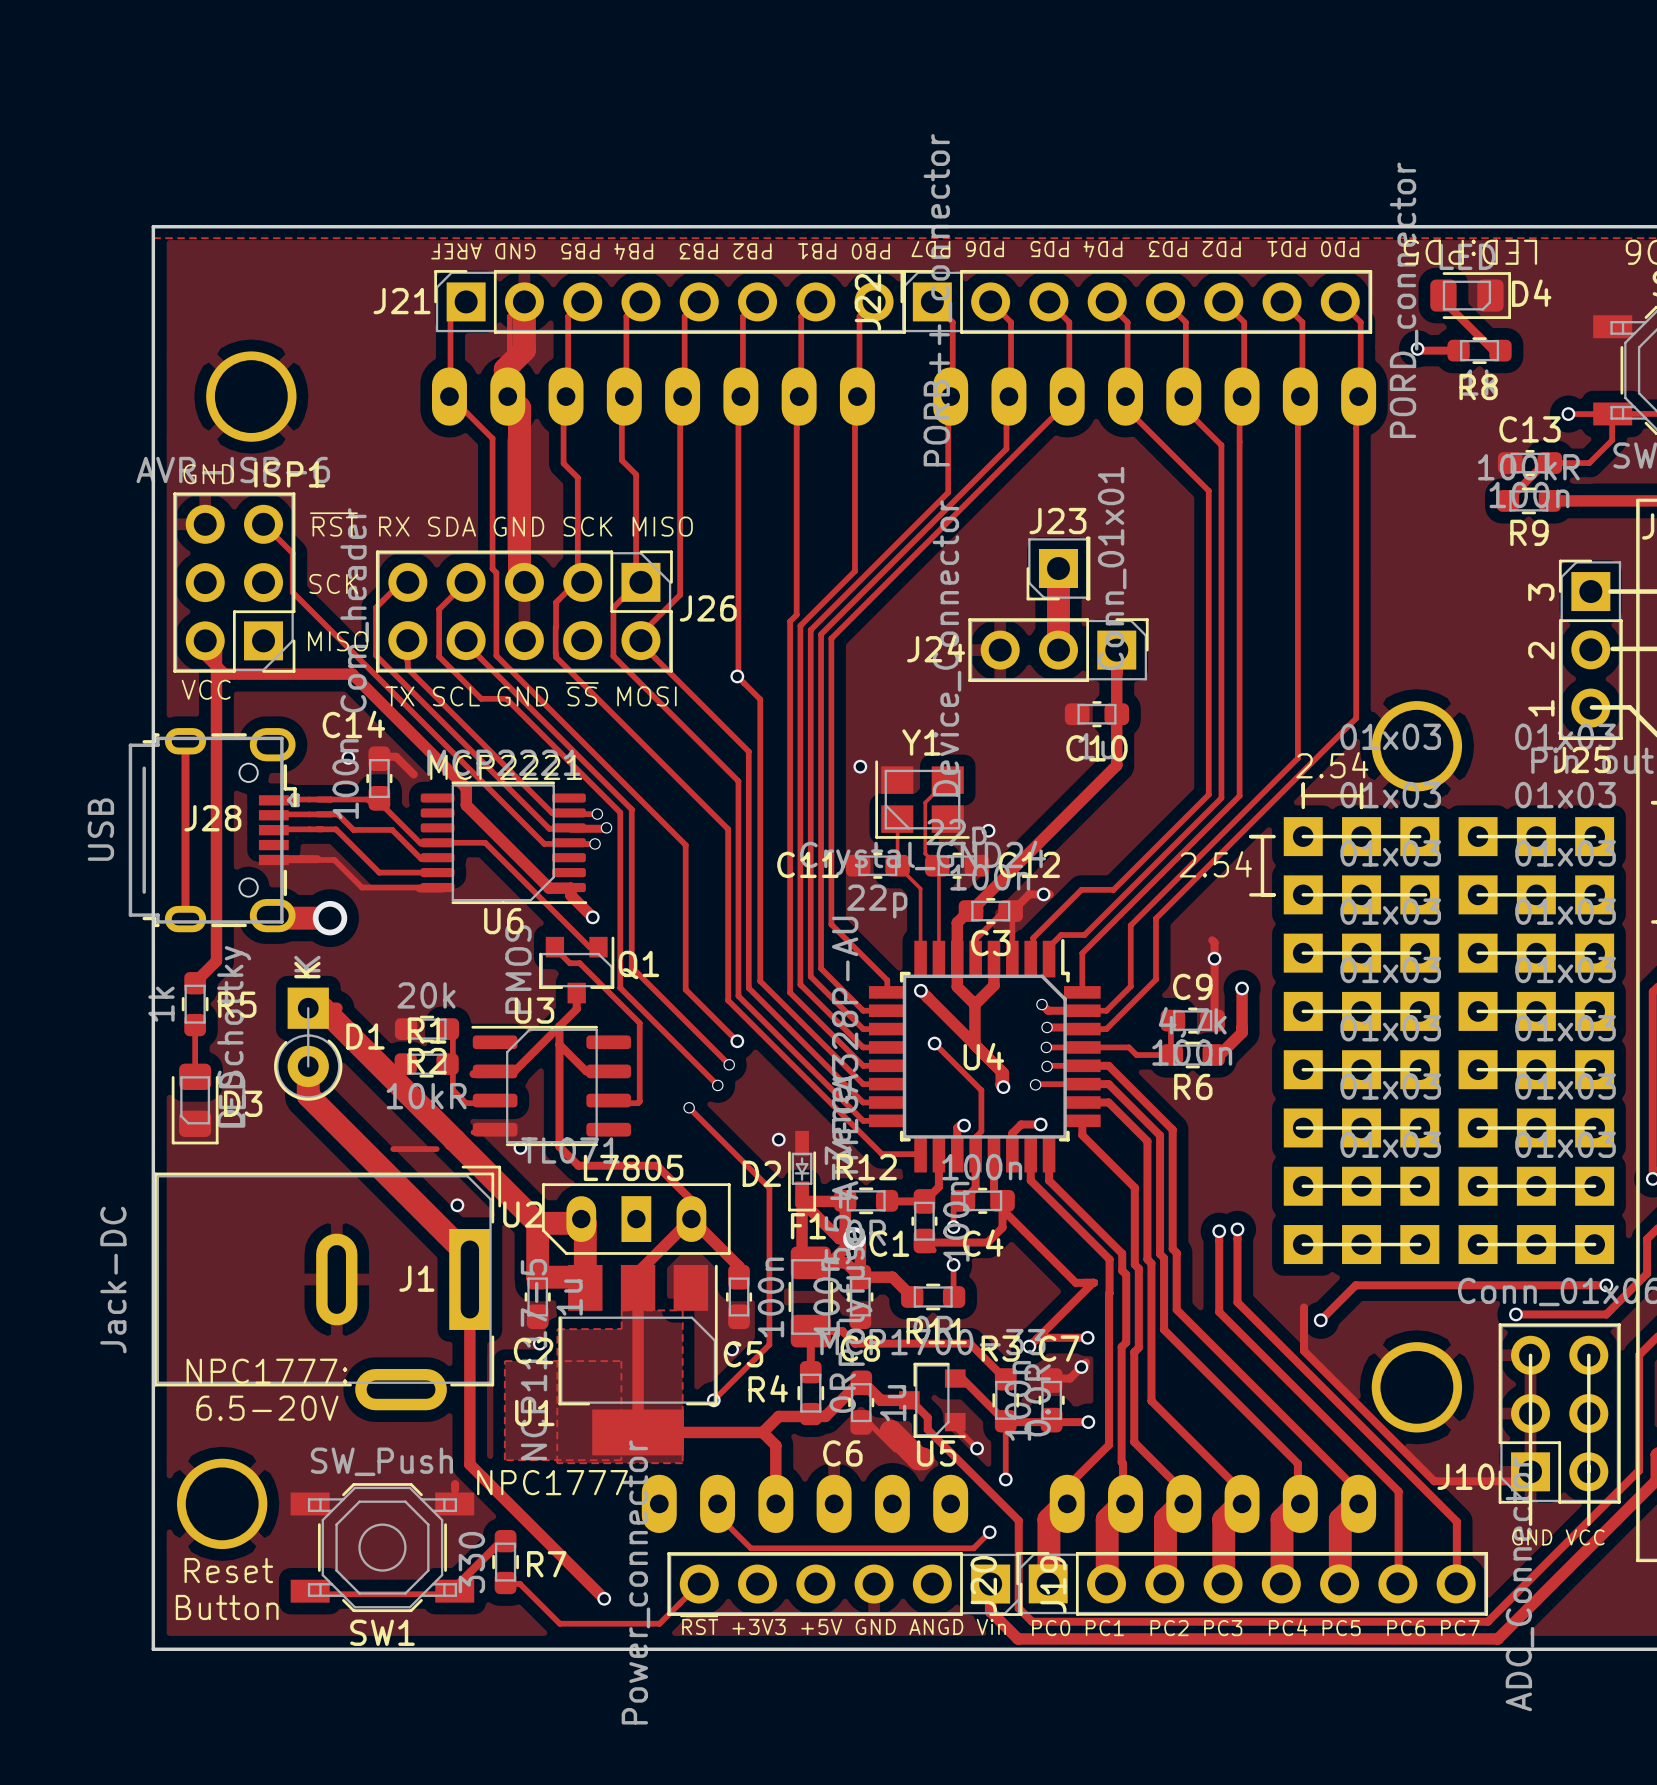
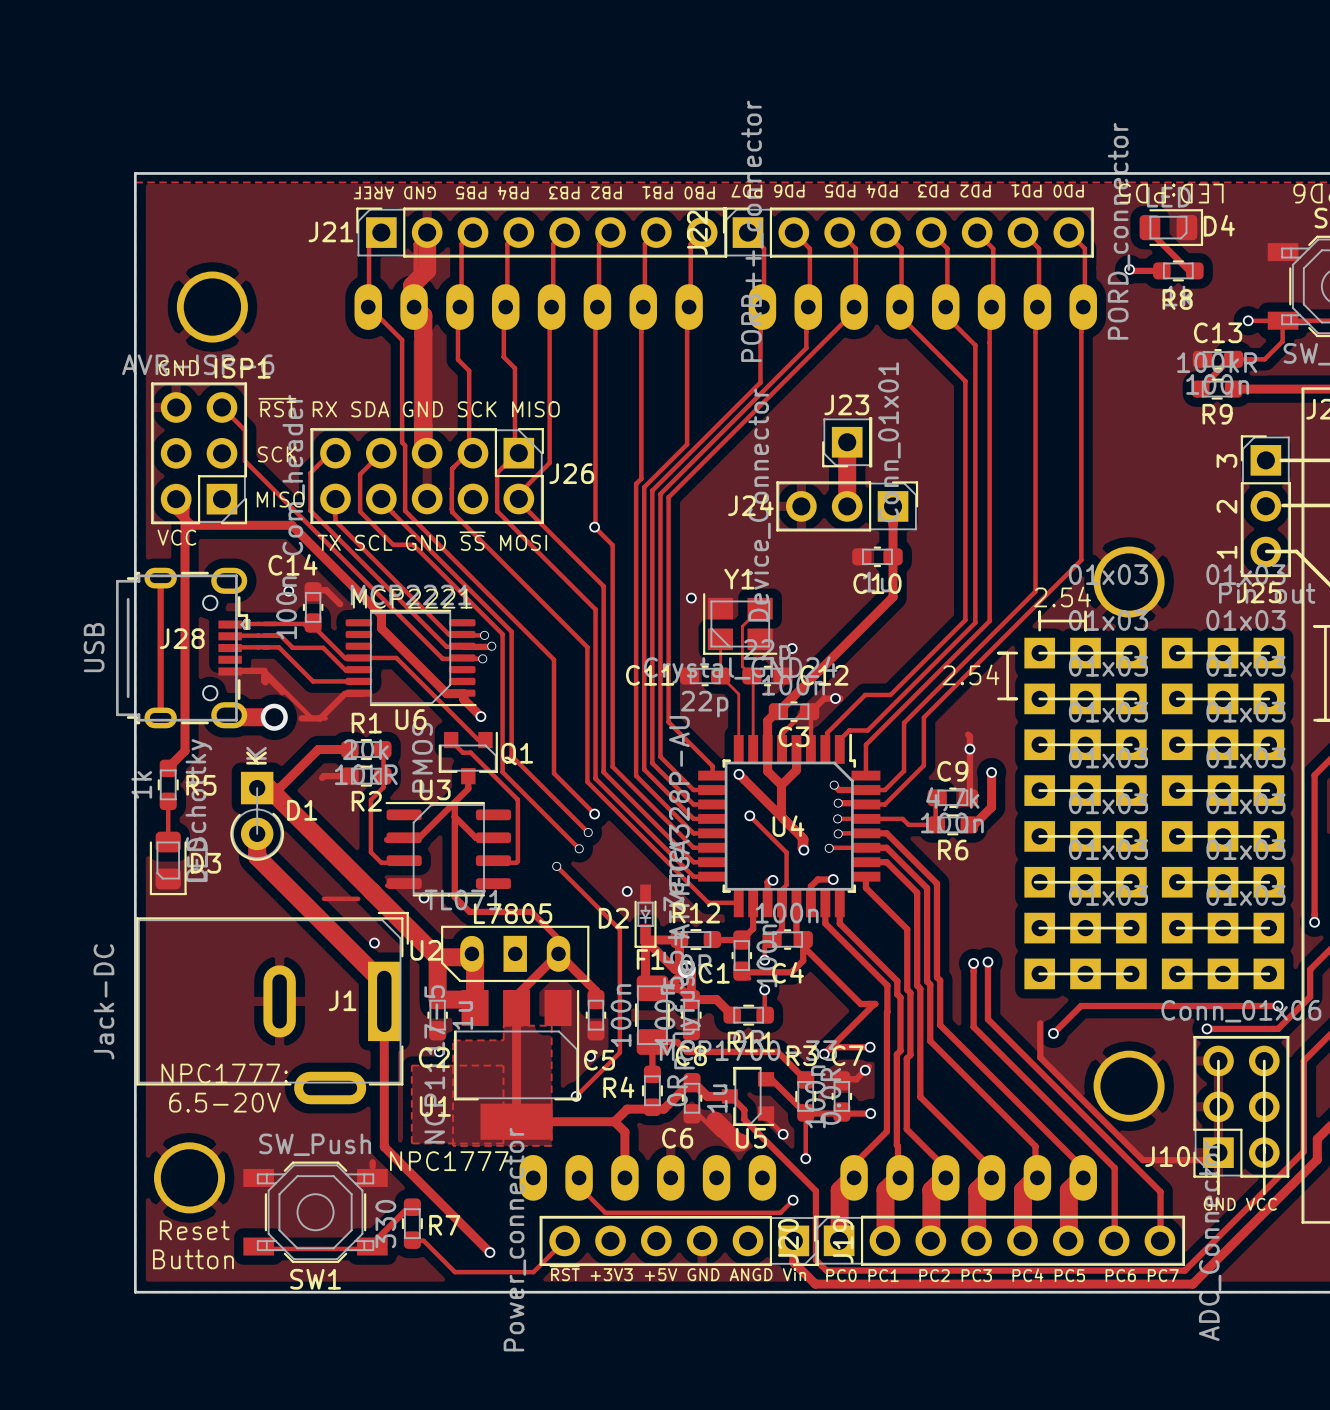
track: (273, 859) (334, 859) (361, 887) (437, 887) -> none
track: none -> (264, 678) (266, 678) (264, 675) (282, 693)
track: none -> (265, 682) (264, 670) (311, 718) (325, 718)
track: none -> (344, 693) (320, 718) (301, 718)
track: none -> (349, 749) (318, 749) (279, 788)
track: none -> (383, 749) (383, 787) (370, 799)
track: none -> (349, 776) (323, 776) (322, 777)
R2 position: (427, 1029) -> (366, 776)
R1 position: (426, 1064) -> (366, 749)

